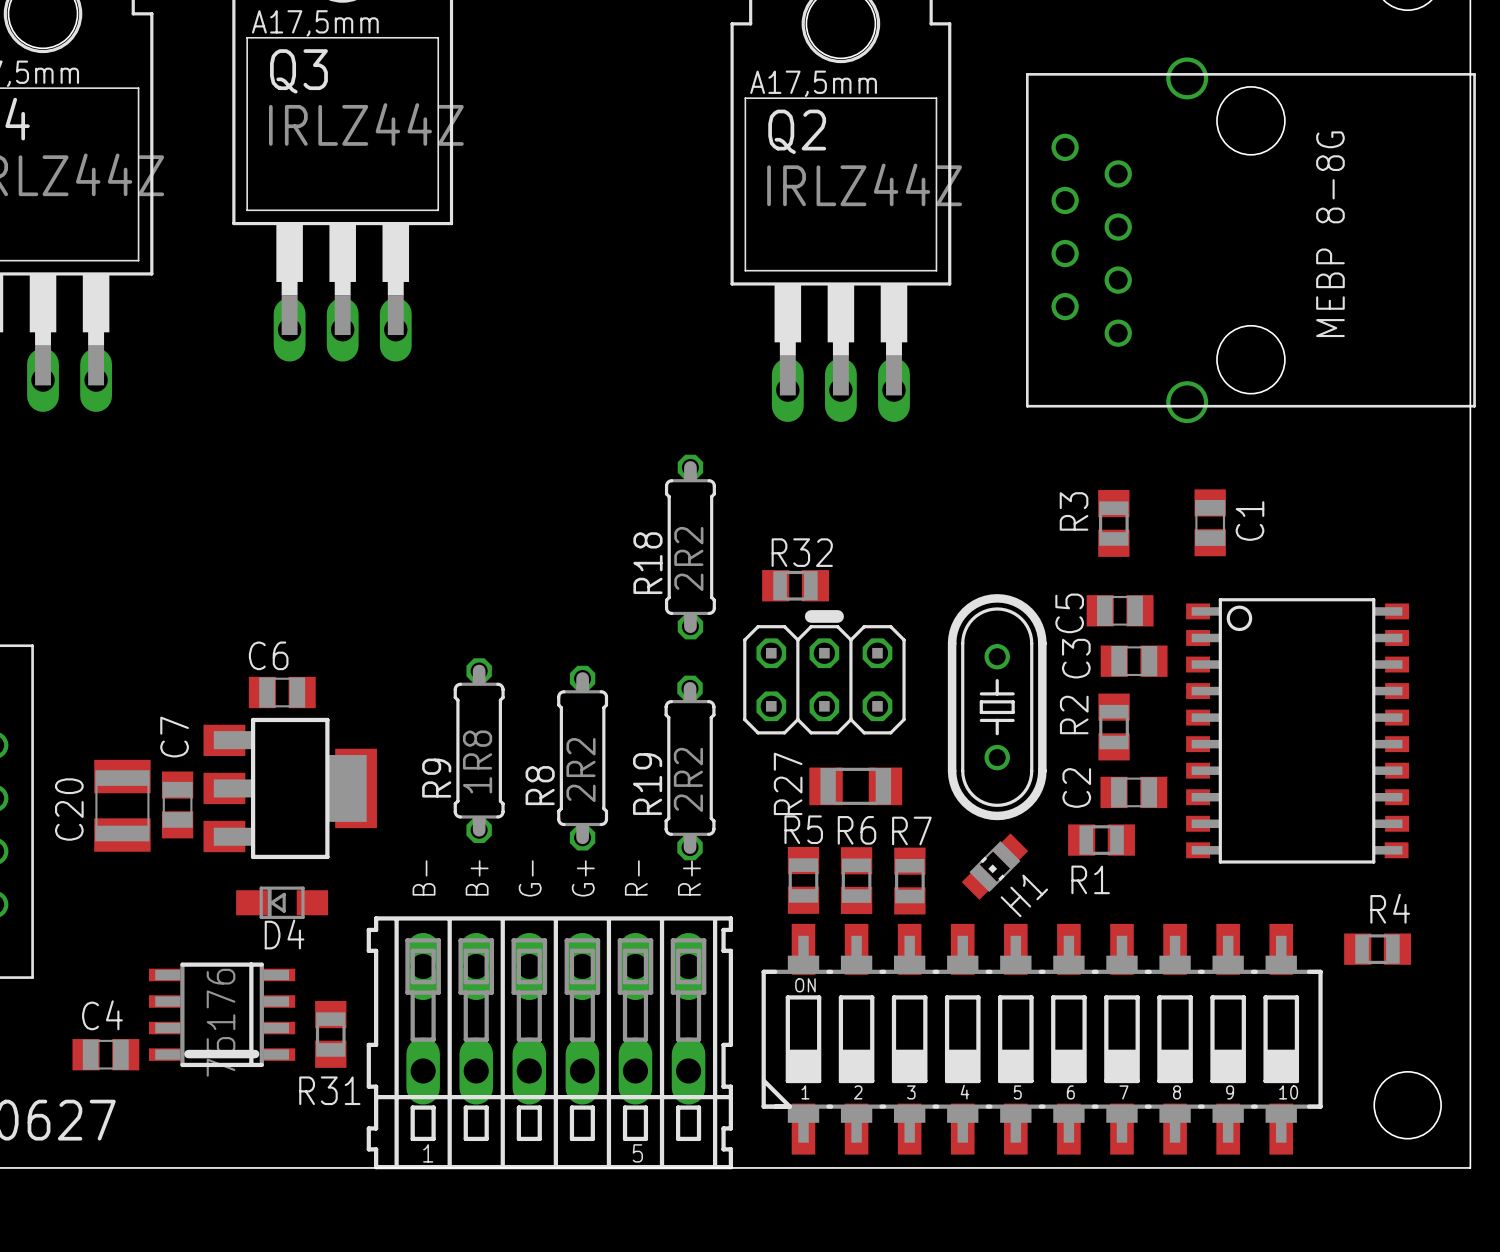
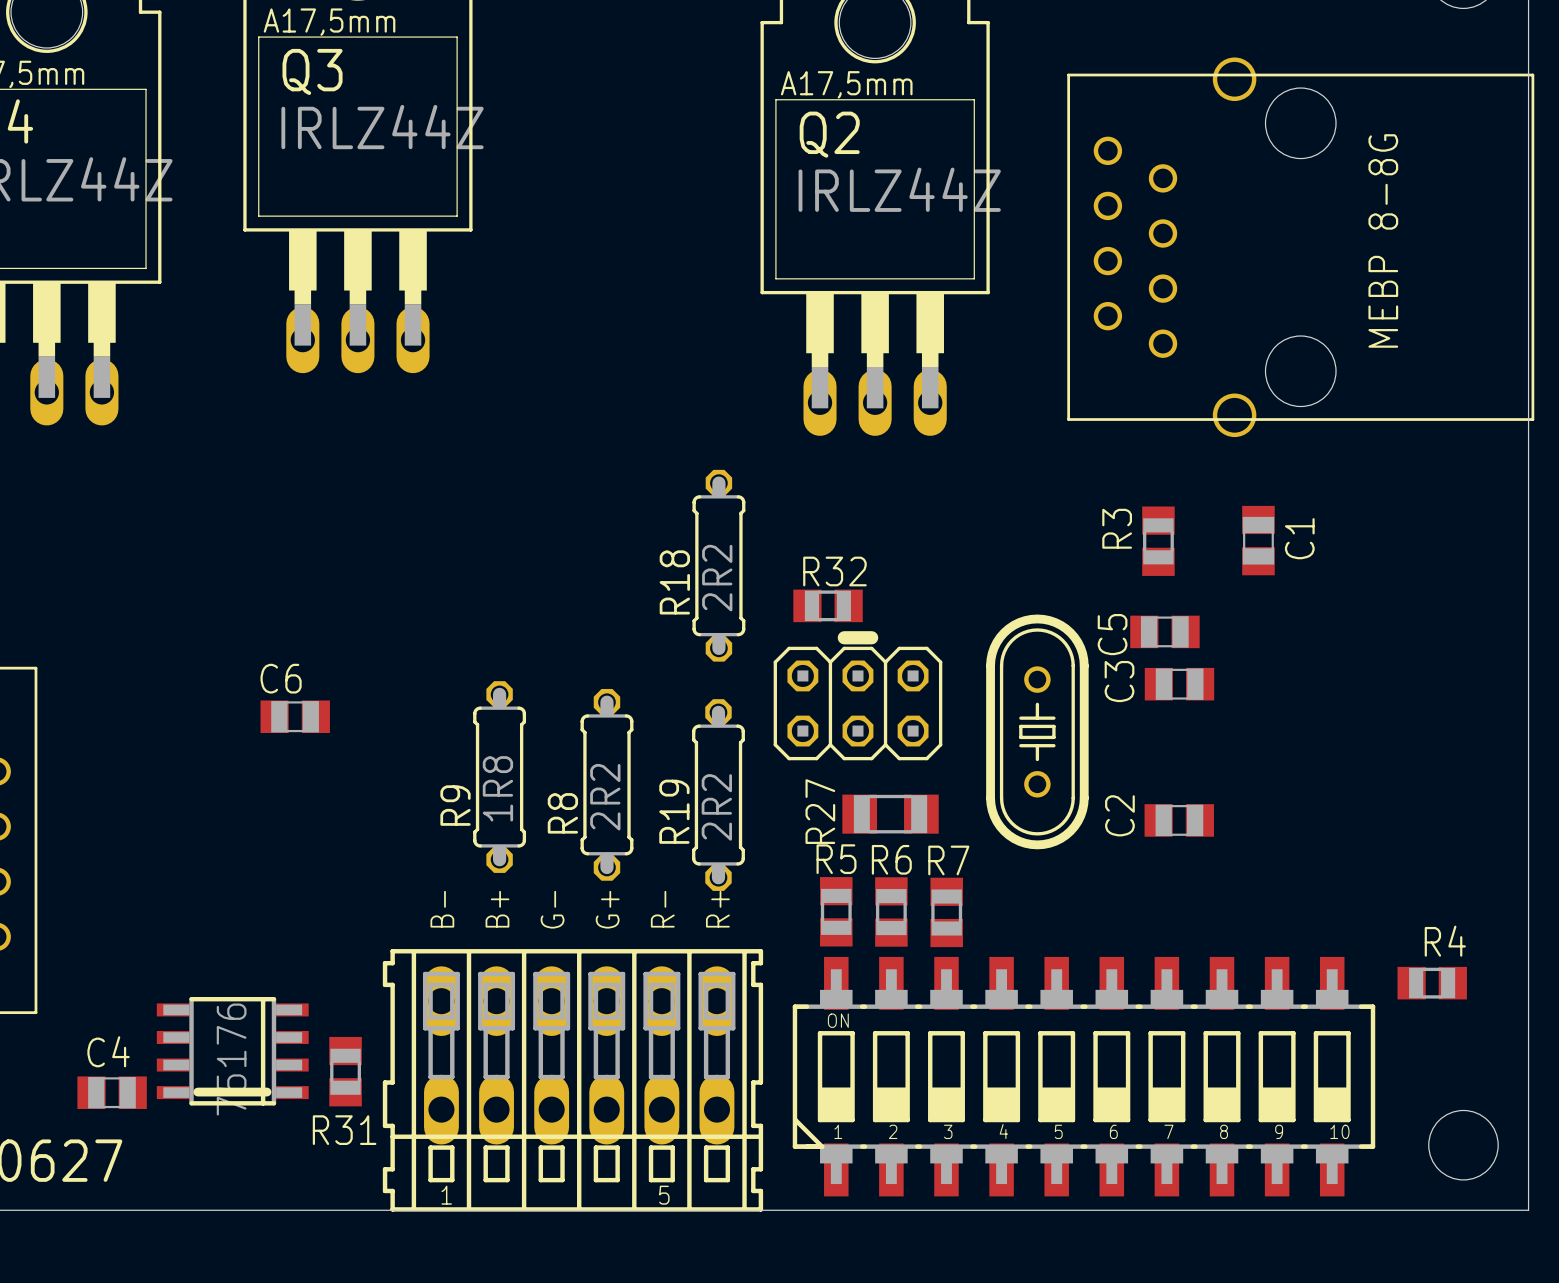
R2: (1114, 727) -> none
part: (1297, 730) -> none
part: (290, 788) -> none
C7: (177, 804) -> none
C20: (122, 805) -> none
R1: (1101, 840) -> none
H1: (994, 866) -> none
D4: (282, 902) -> none

